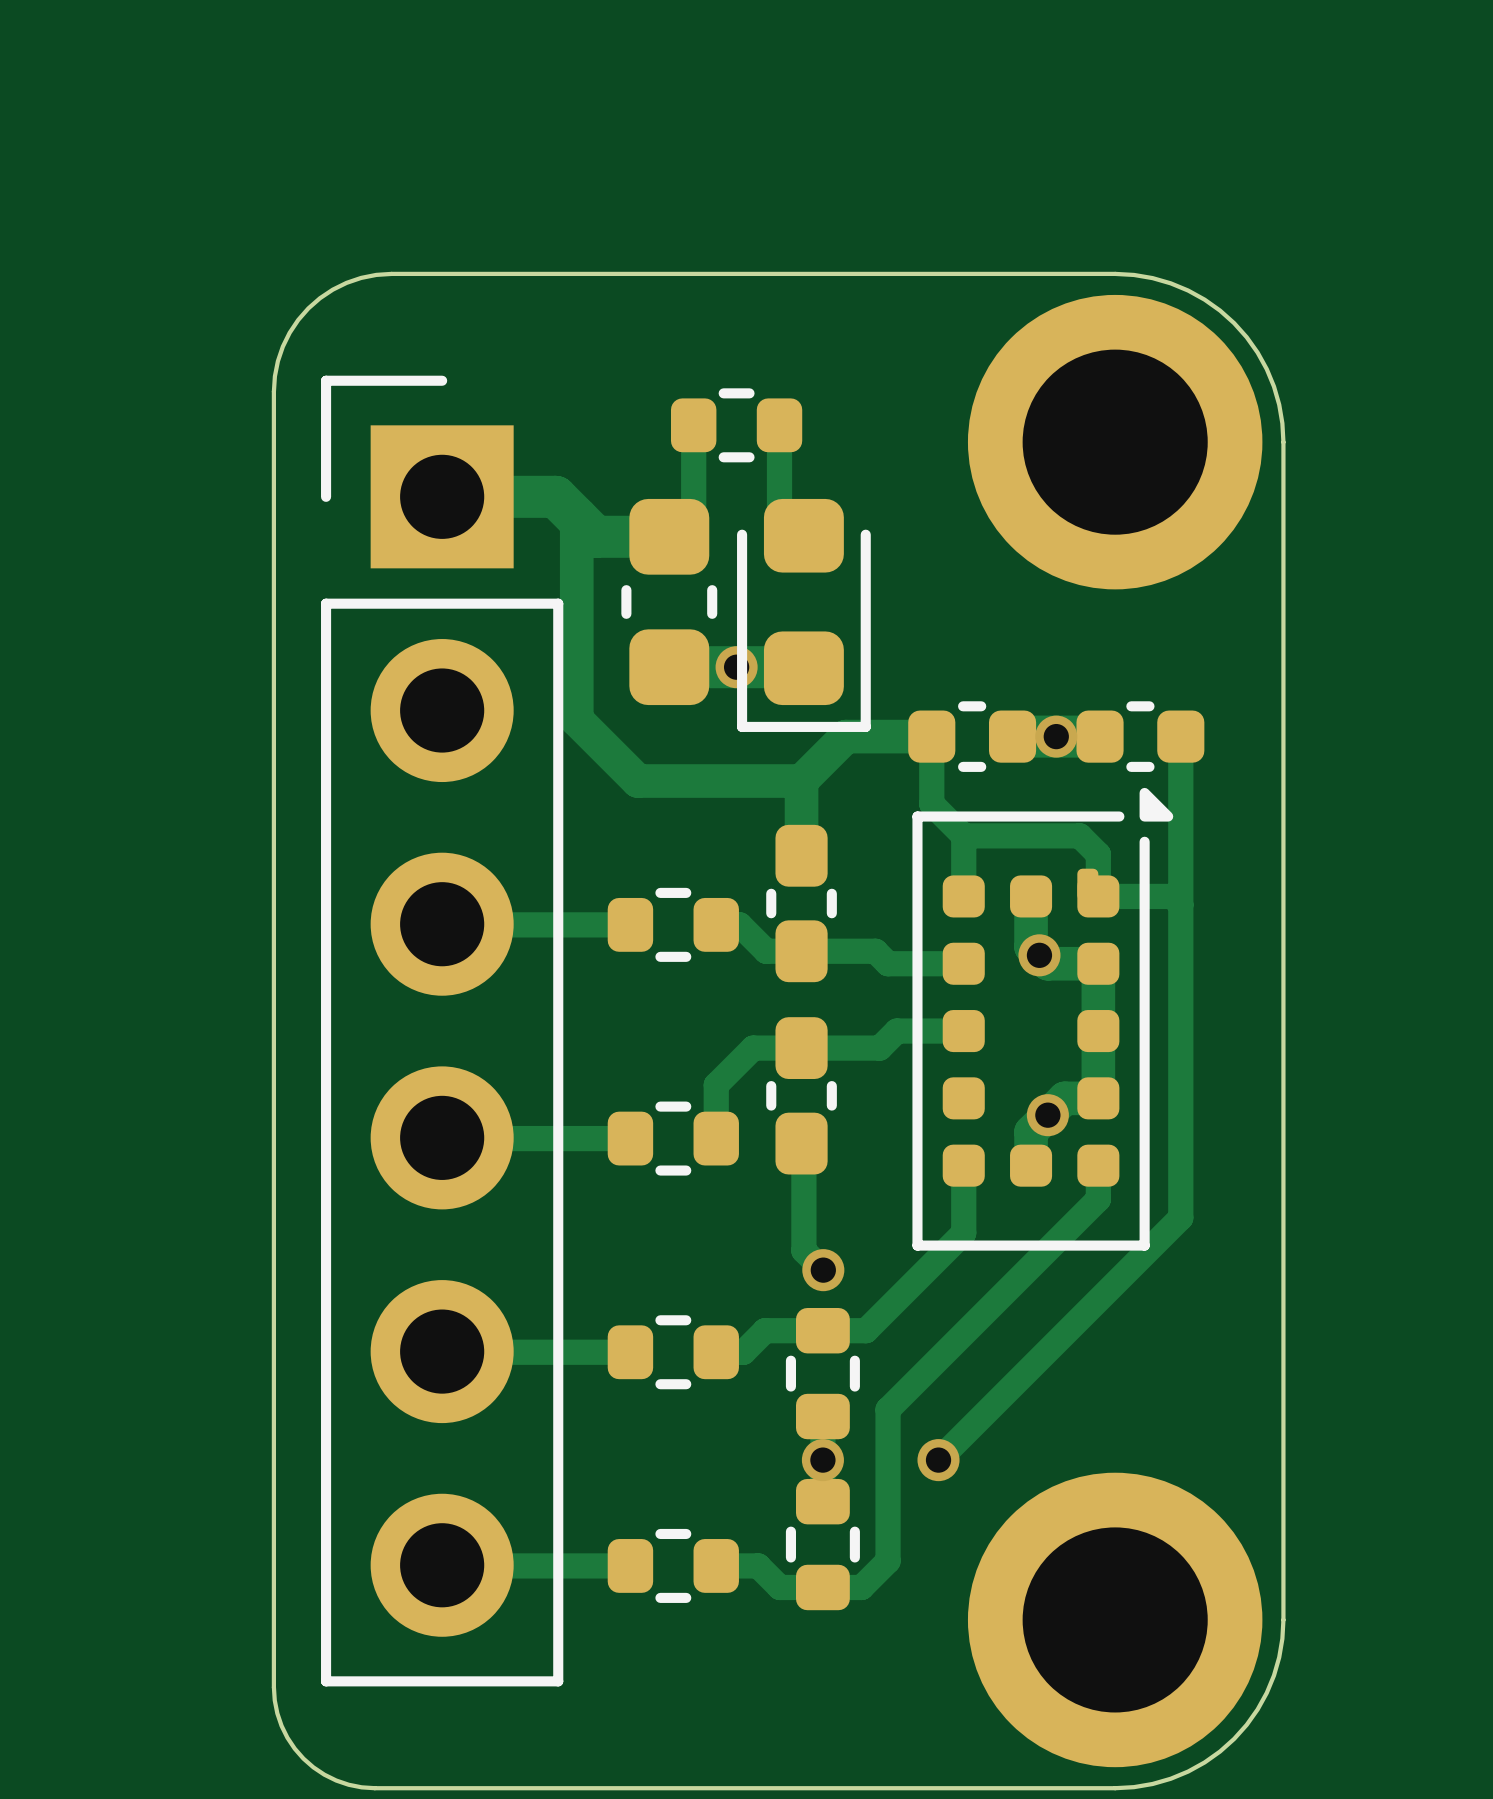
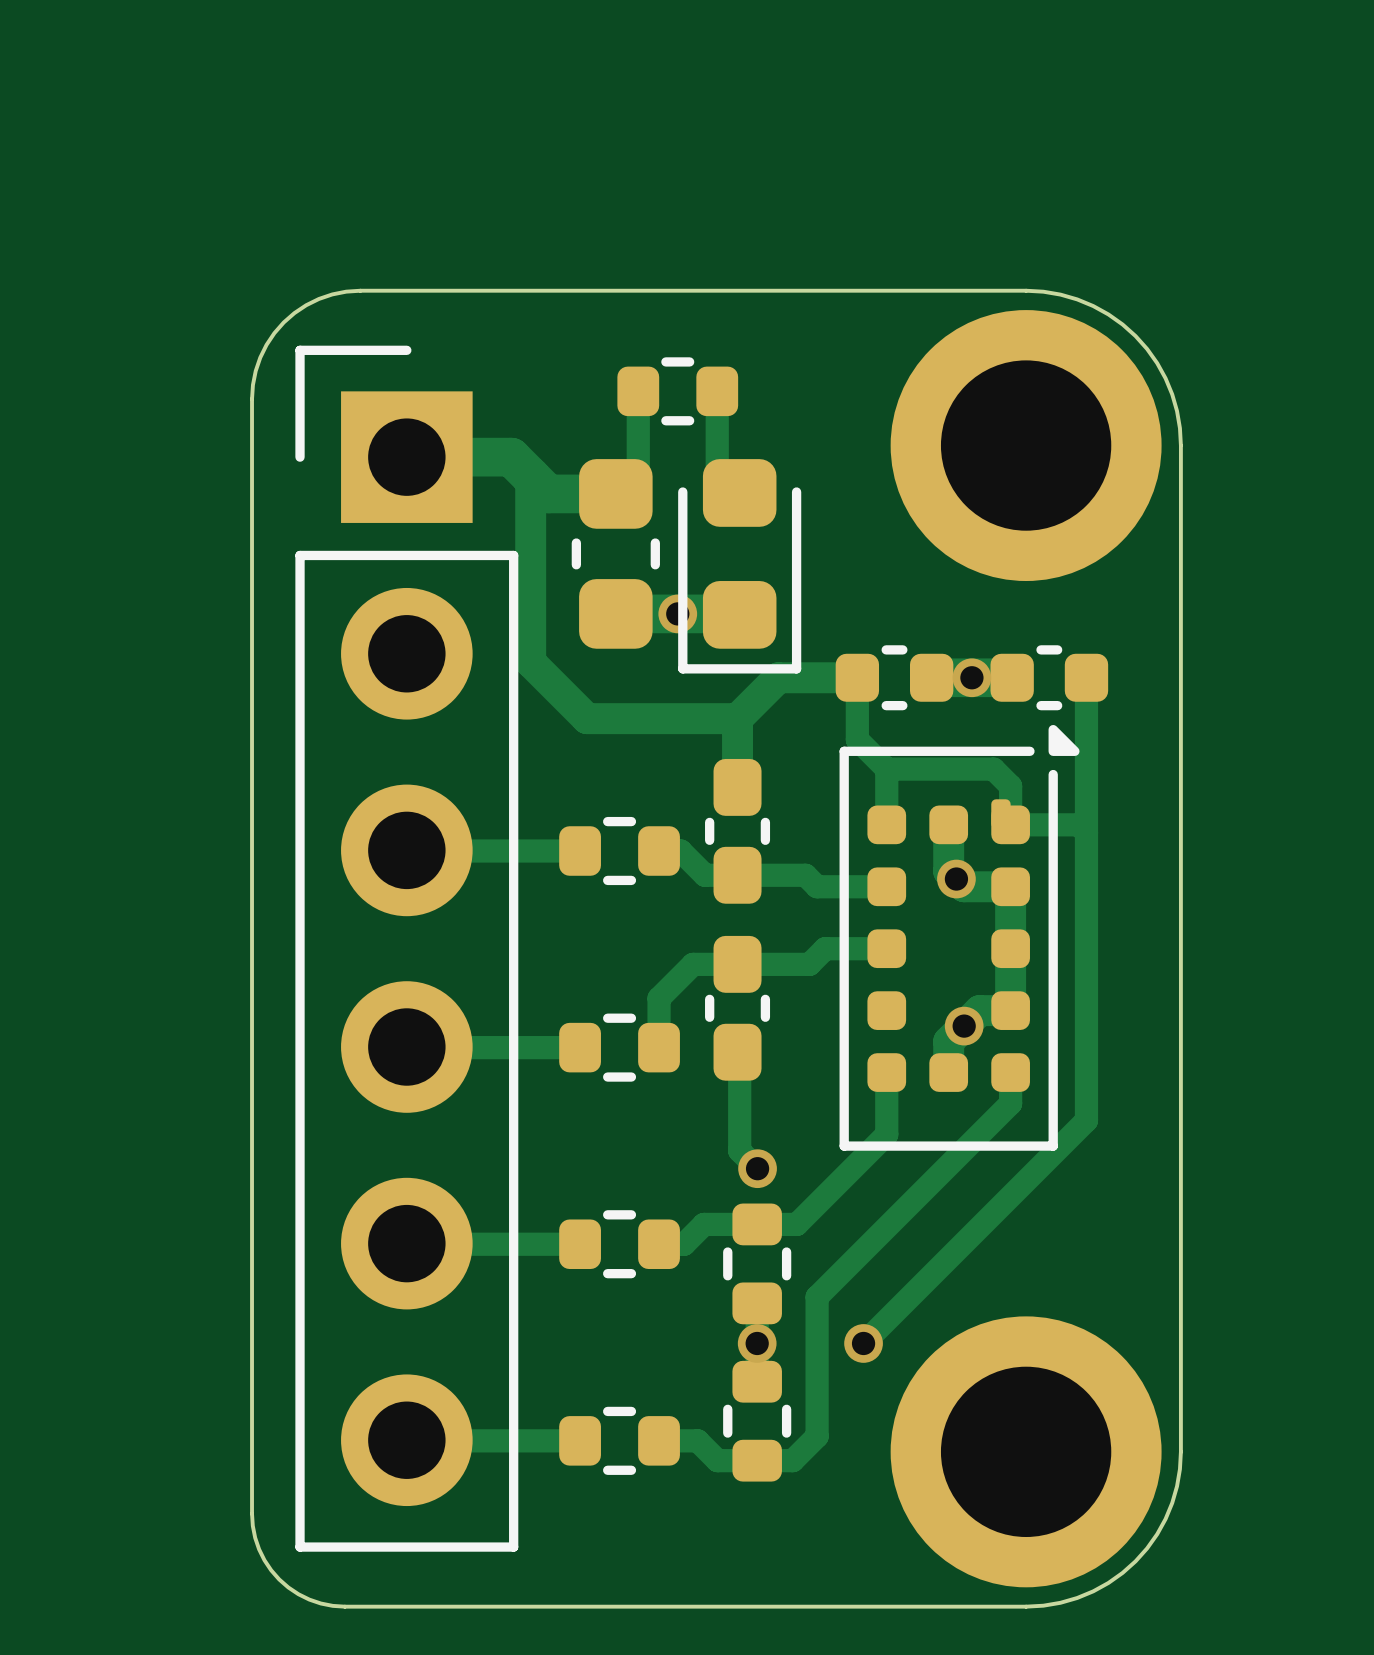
board edge: (273, 433) (274, 376) (277, 361) (289, 332) (308, 308) (332, 289) (346, 282) (376, 274) (1115, 273) (1152, 278) (1188, 290) (1220, 310) (1246, 337) (1266, 369) (1279, 404) (1283, 442) (1283, 484) -> (252, 399) (252, 384) (260, 357) (266, 344) (283, 322) (294, 313) (318, 298) (346, 291) (1026, 290) (1043, 291) (1077, 299) (1108, 314) (1135, 336) (1157, 363) (1165, 378) (1177, 411) (1180, 445)
part position: (1115, 442) -> (1026, 445)
board edge: (1283, 1577) (1283, 1619) (1279, 1657) (1266, 1692) (1246, 1724) (1220, 1751) (1188, 1771) (1170, 1778) (1134, 1787) (361, 1787) (336, 1780) (324, 1774) (303, 1758) (287, 1737) (277, 1713) (274, 1700) (273, 1645) -> (1180, 1451) (1177, 1486) (1165, 1519) (1157, 1534) (1135, 1561) (1122, 1572) (1093, 1591) (1077, 1597) (1043, 1605) (332, 1605) (309, 1599) (288, 1587) (279, 1579) (271, 1570) (259, 1549) (255, 1537) (252, 1513)
part position: (1115, 1619) -> (1026, 1451)

